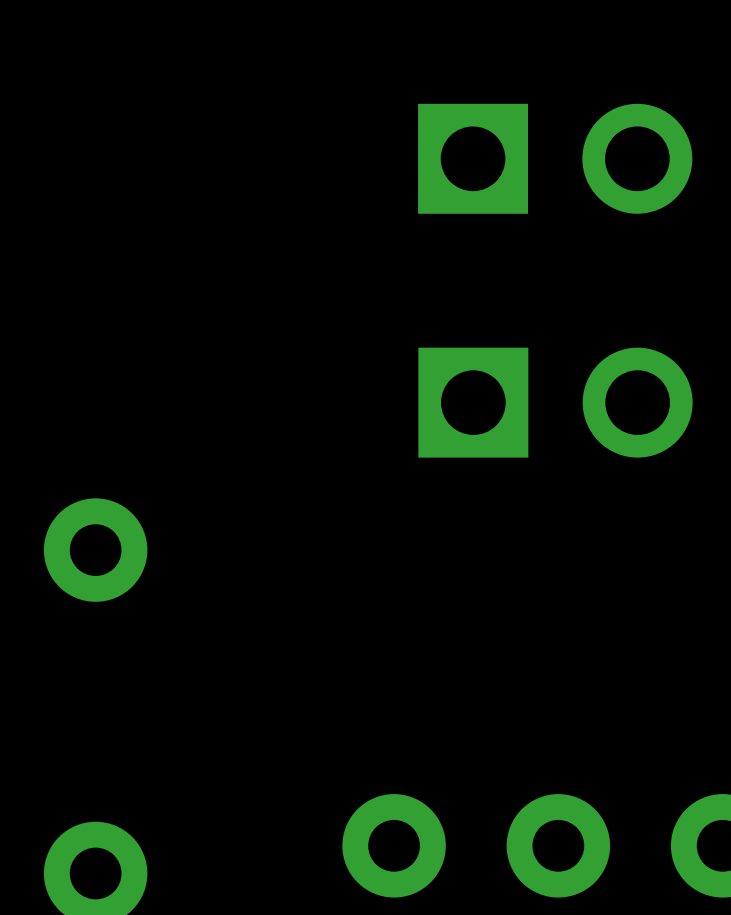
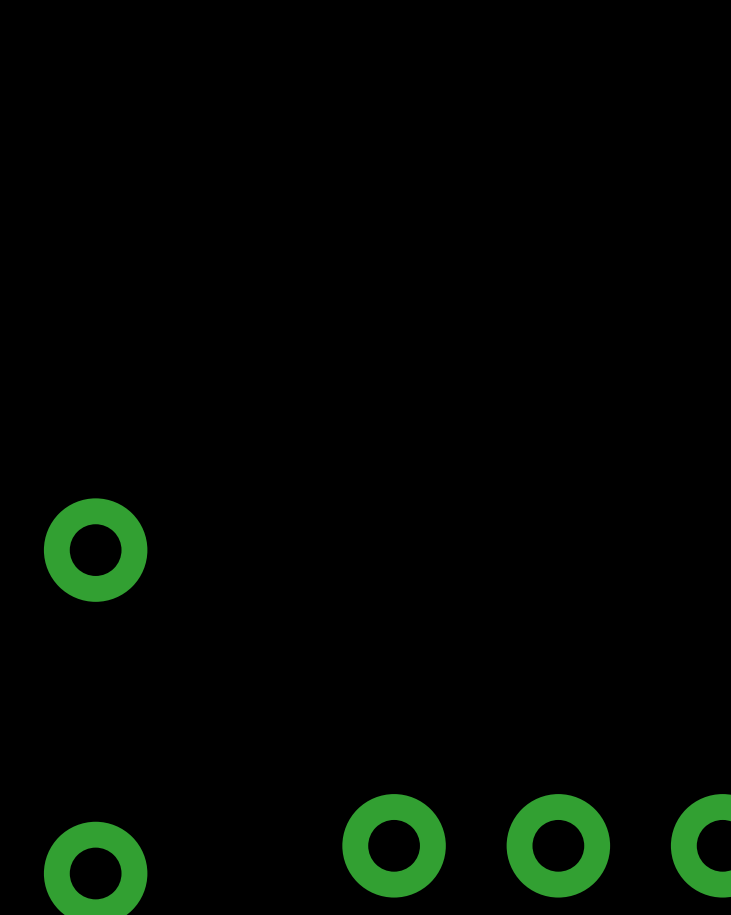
part: (555, 158) -> none
part: (555, 402) -> none

